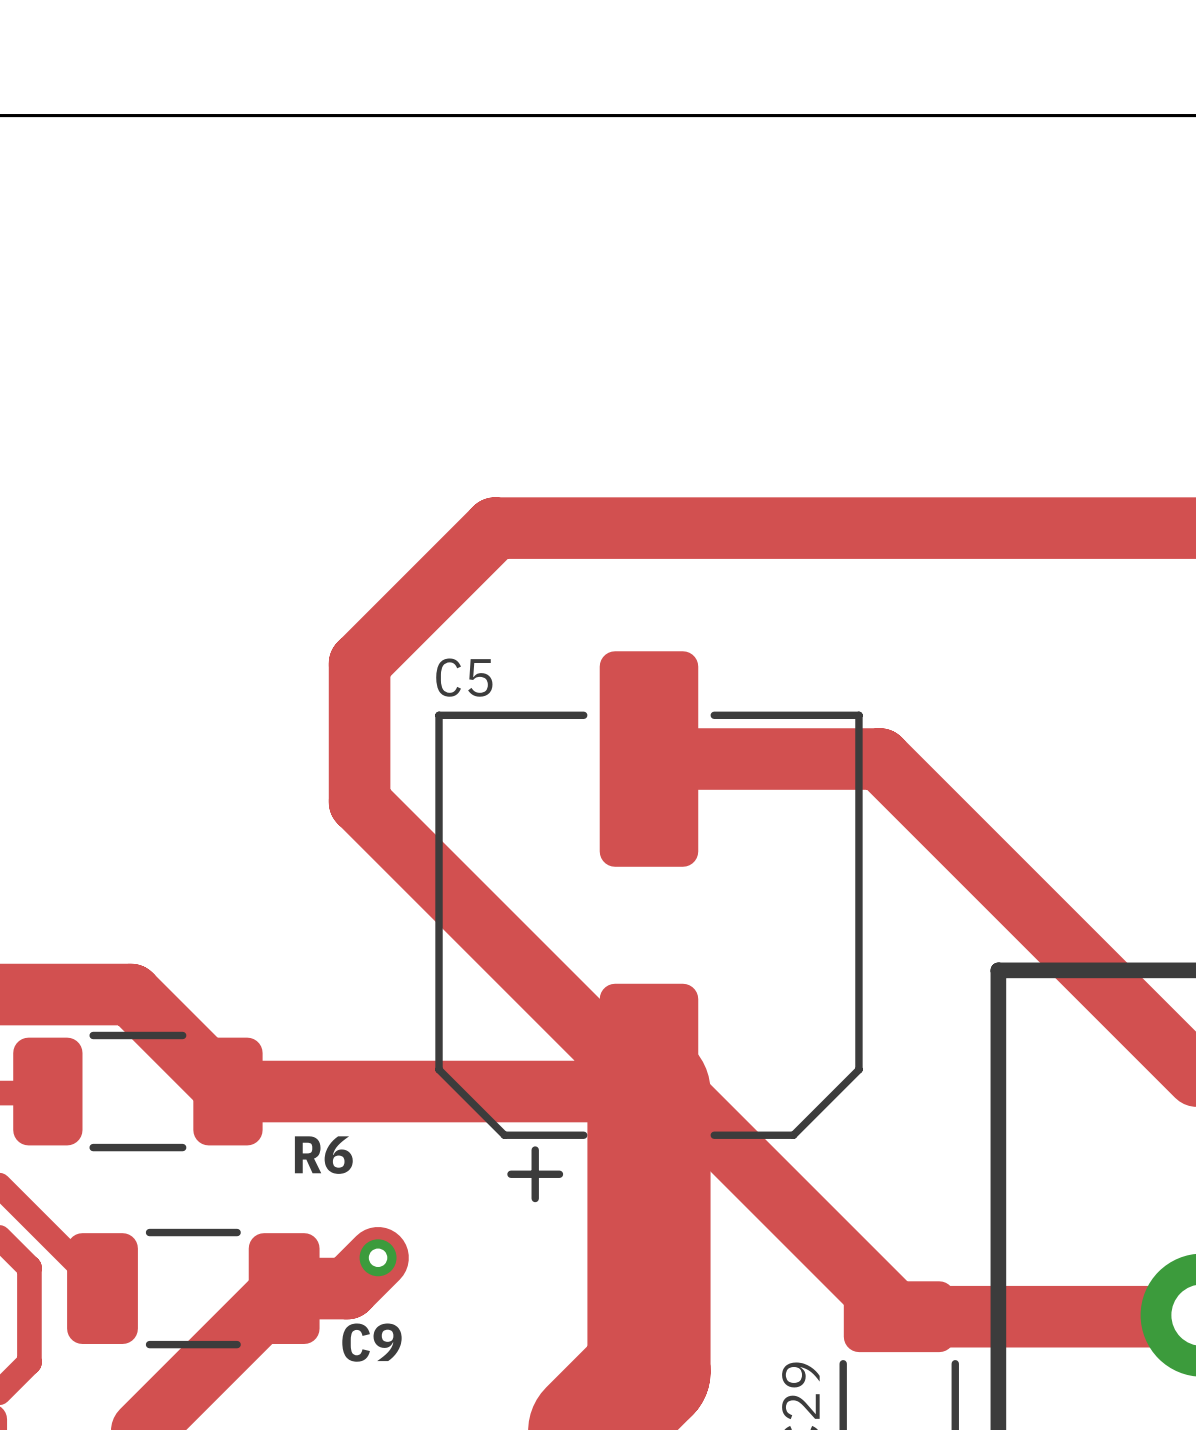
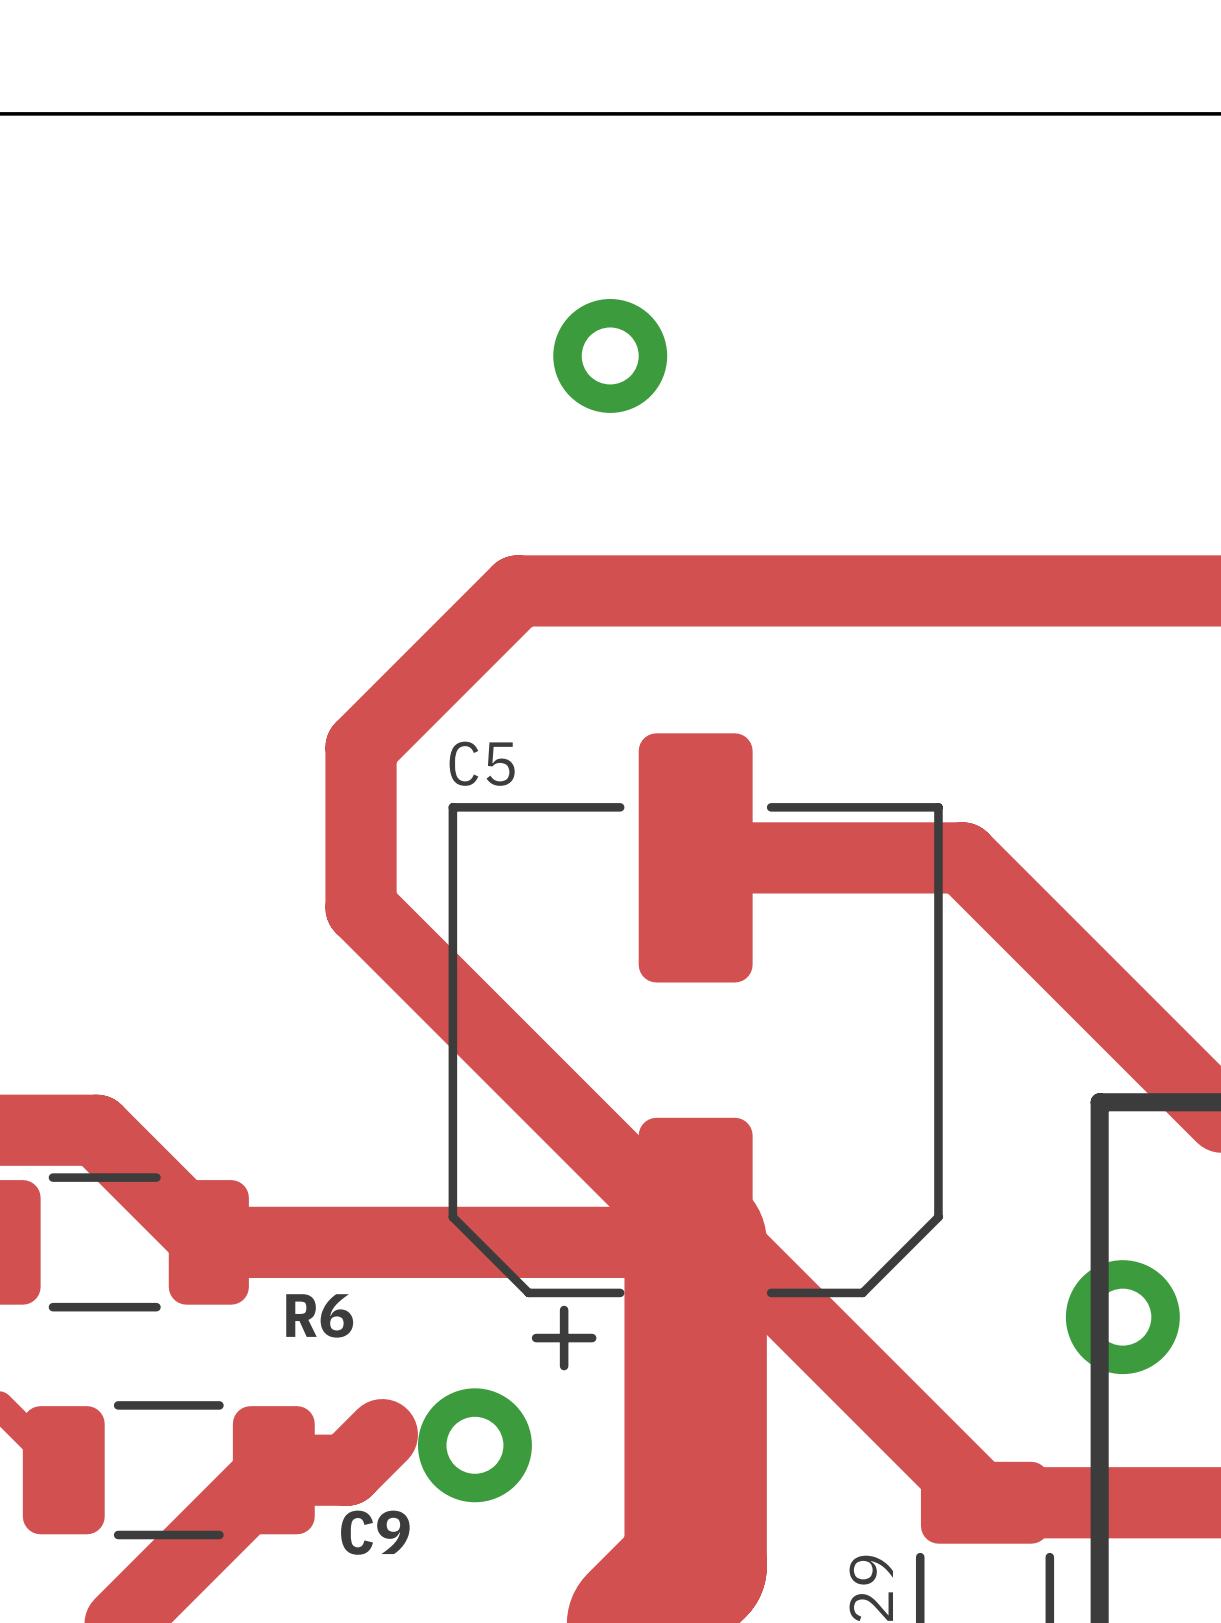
via: none -> (610, 355)
via: none -> (1122, 1317)
via: (378, 1257) -> none
via: none -> (474, 1445)

